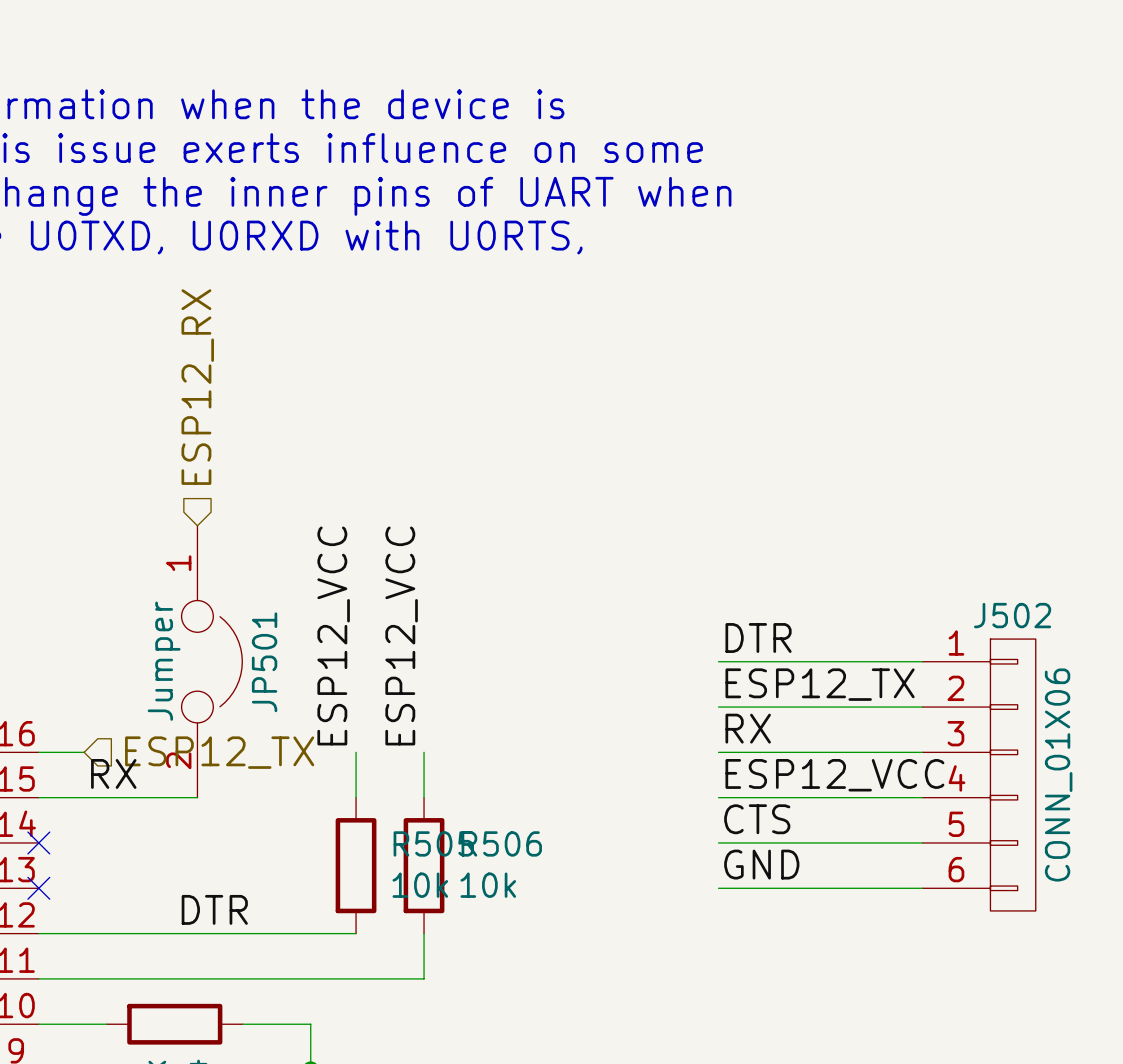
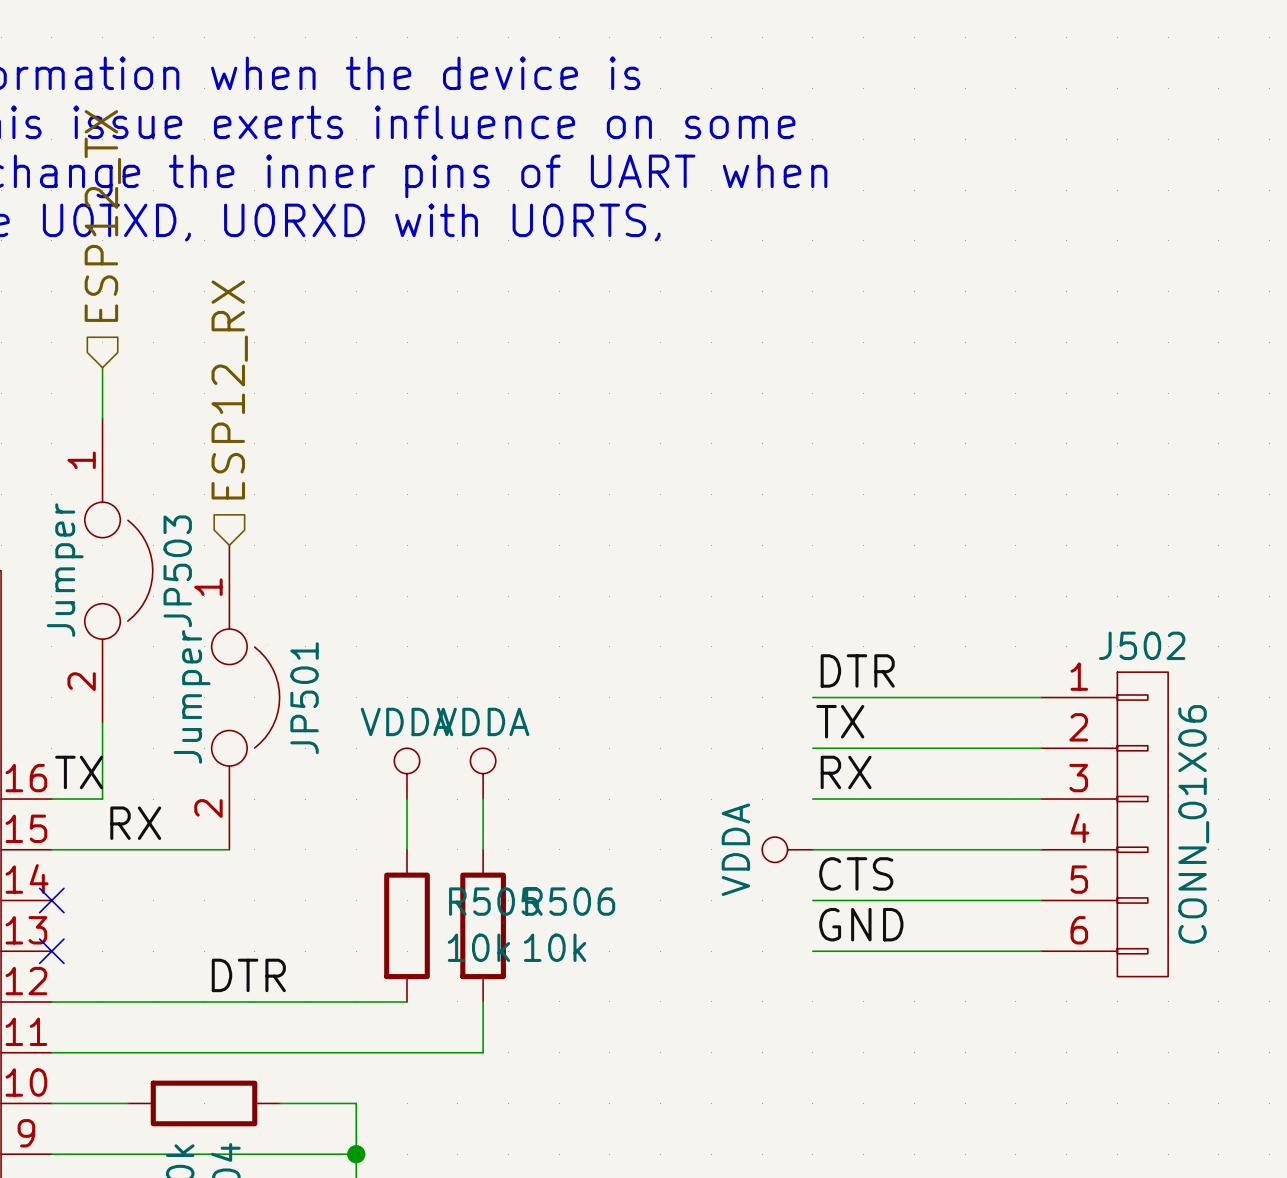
wire: none -> (102, 367) (102, 418)
JP503: none -> Jumper (118, 570)
label: ESP12_VCC (333, 635) -> none
label: ESP12_VCC (401, 635) -> none
wire: none -> (102, 722) (102, 799)
label: ESP12_TX (820, 684) -> TX (840, 721)
label: none -> TX (79, 772)
power symbol: none -> VDDA (407, 773)
power symbol: none -> VDDA (483, 773)
hierarchical label rotation: 0° (219, 752) -> 90° counterclockwise (102, 216)
hierarchical label position: ESP12_TX (219, 752) -> ESP12_TX (102, 216)
label: ESP12_VCC (834, 775) -> none
power symbol: none -> VDDA (787, 849)

